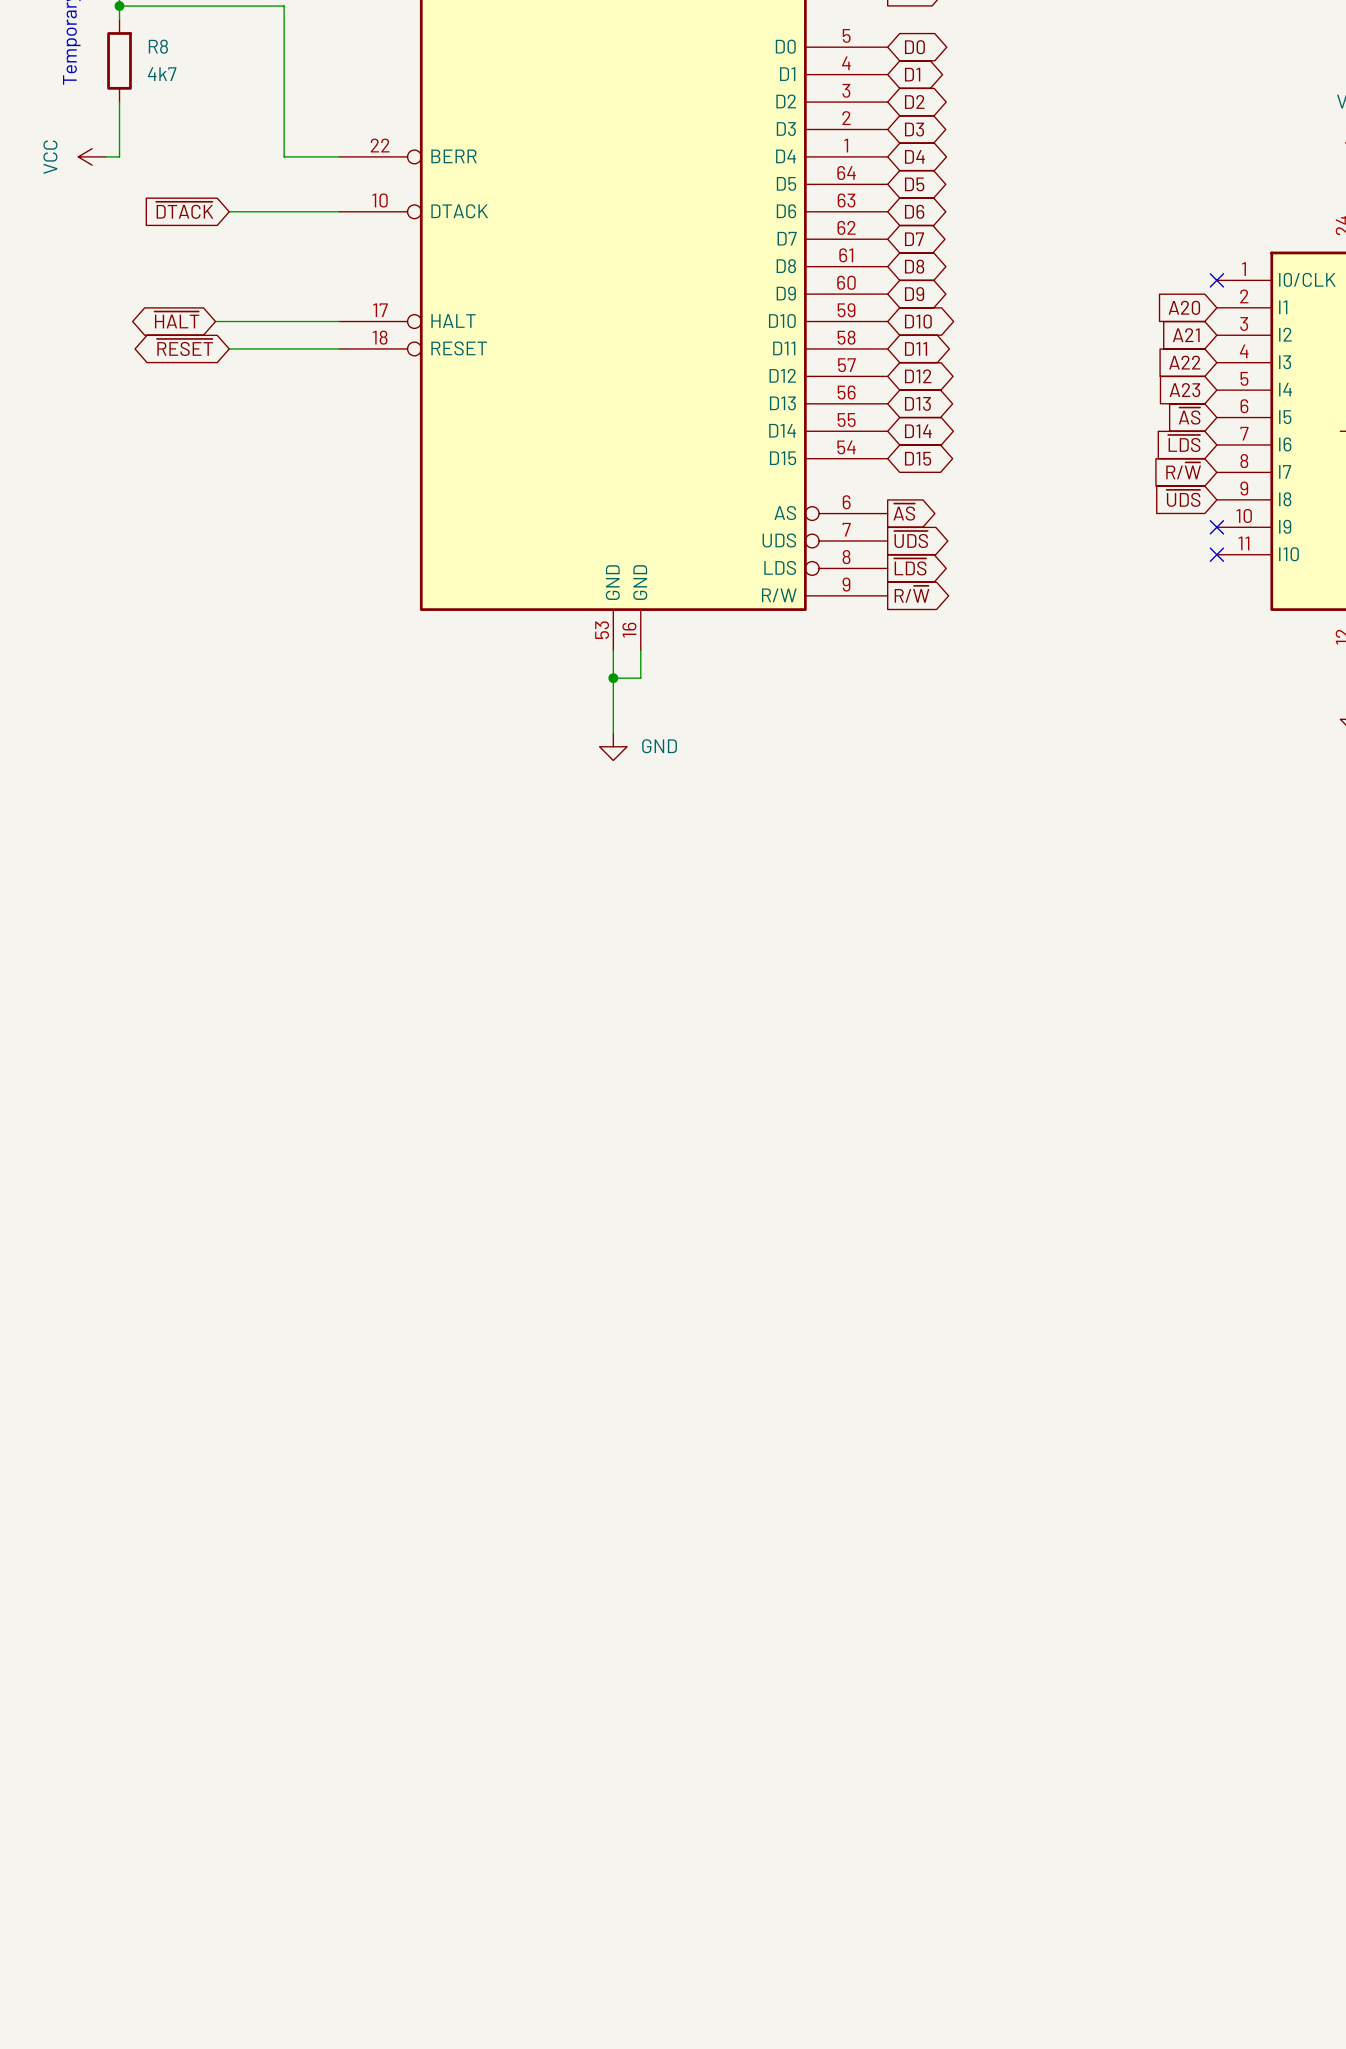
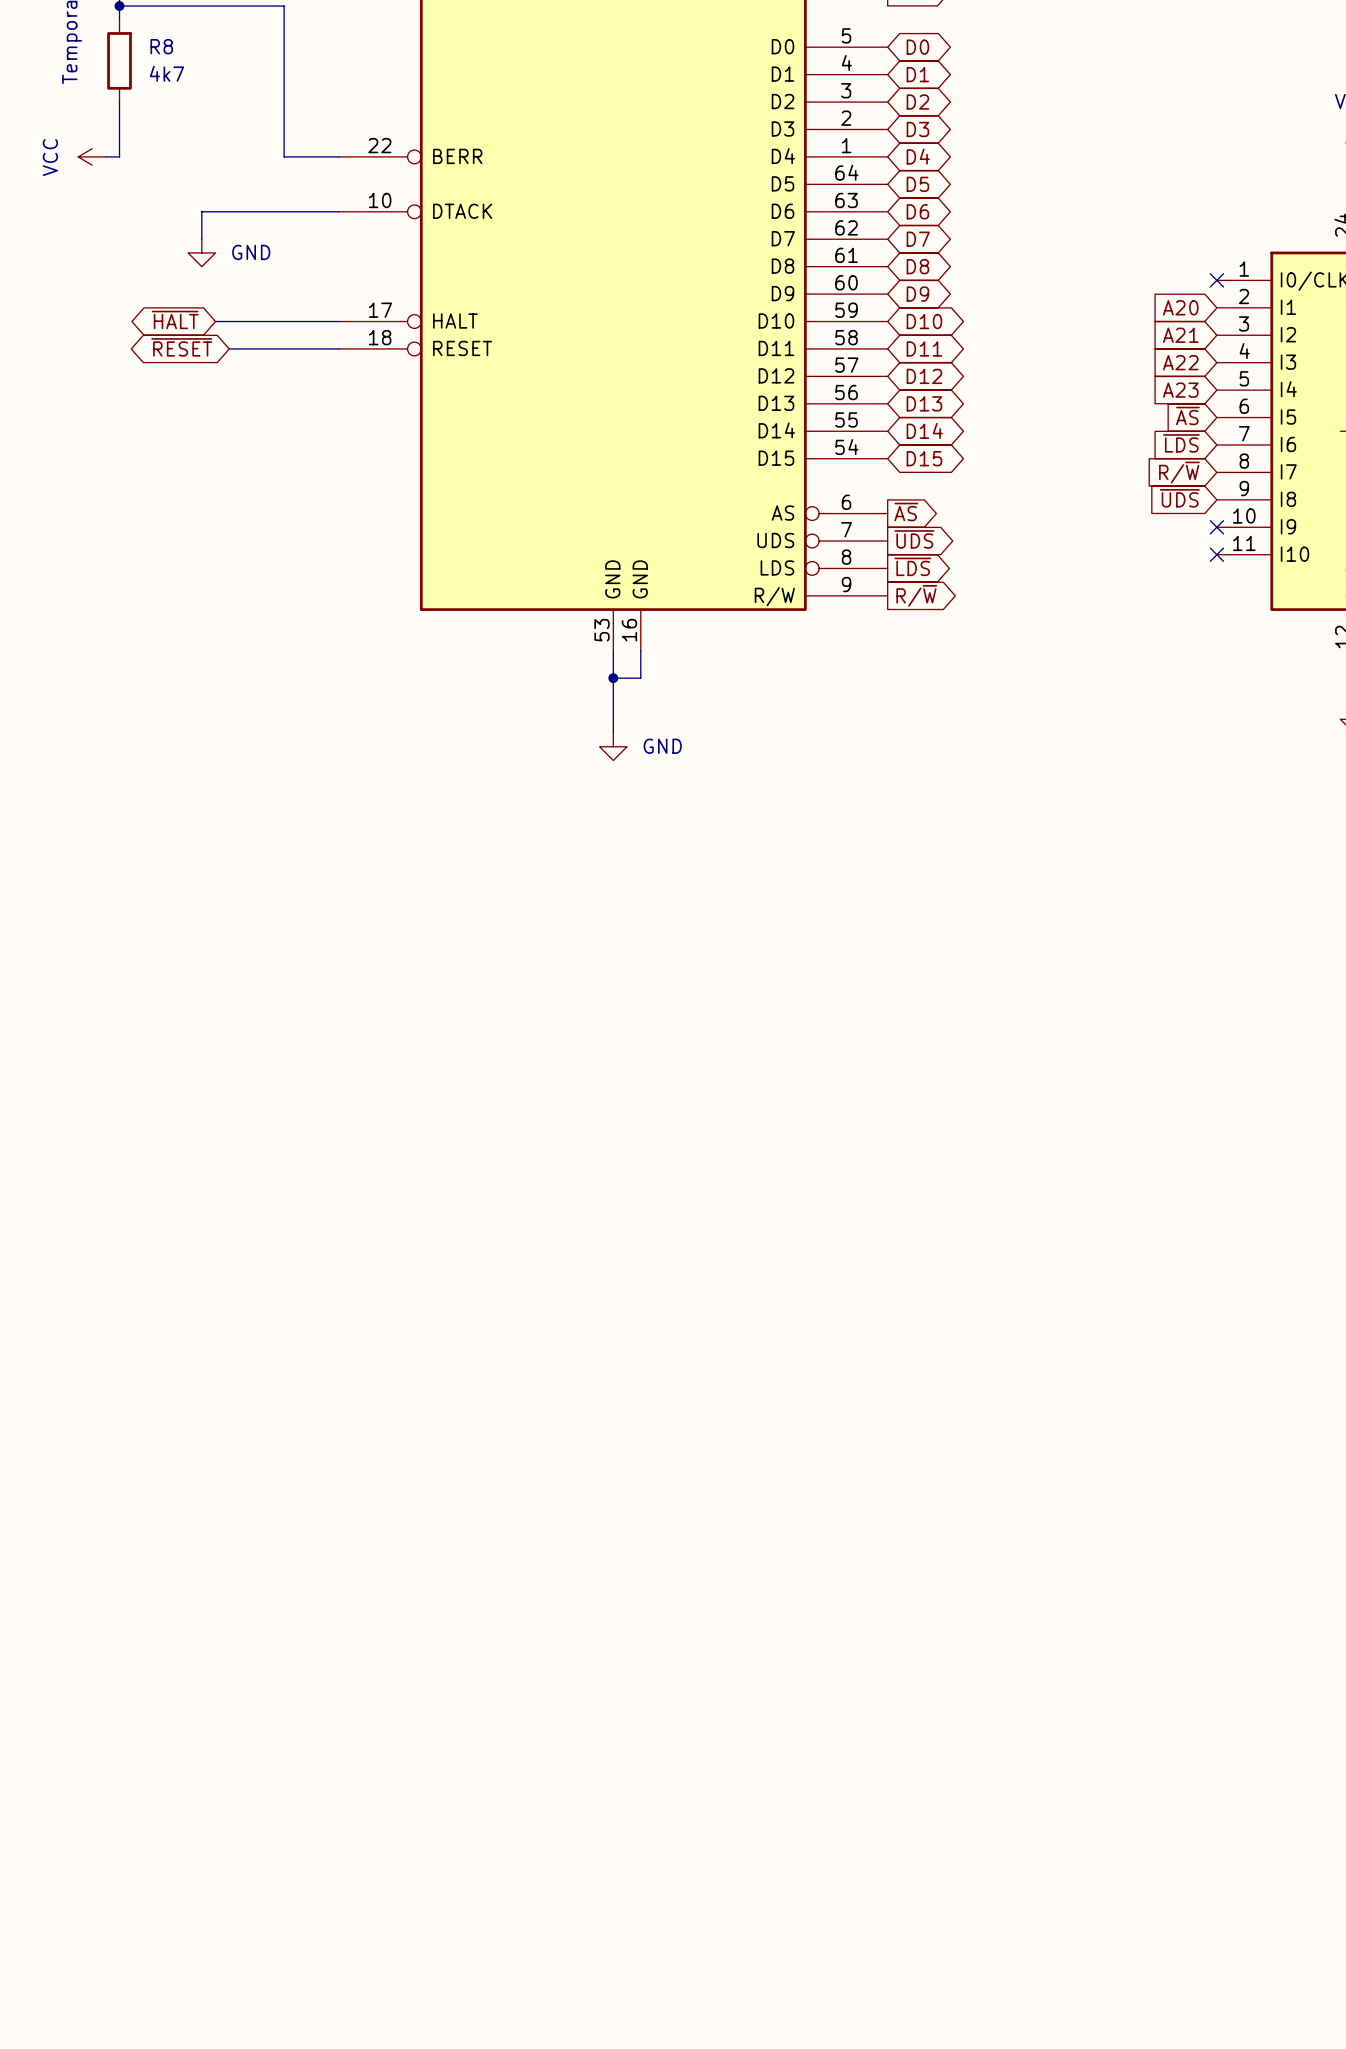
global label: ~{DTACK} (184, 210) -> none
wire: none -> (229, 211) (201, 211) (201, 239)
power symbol: none -> GND (201, 252)

